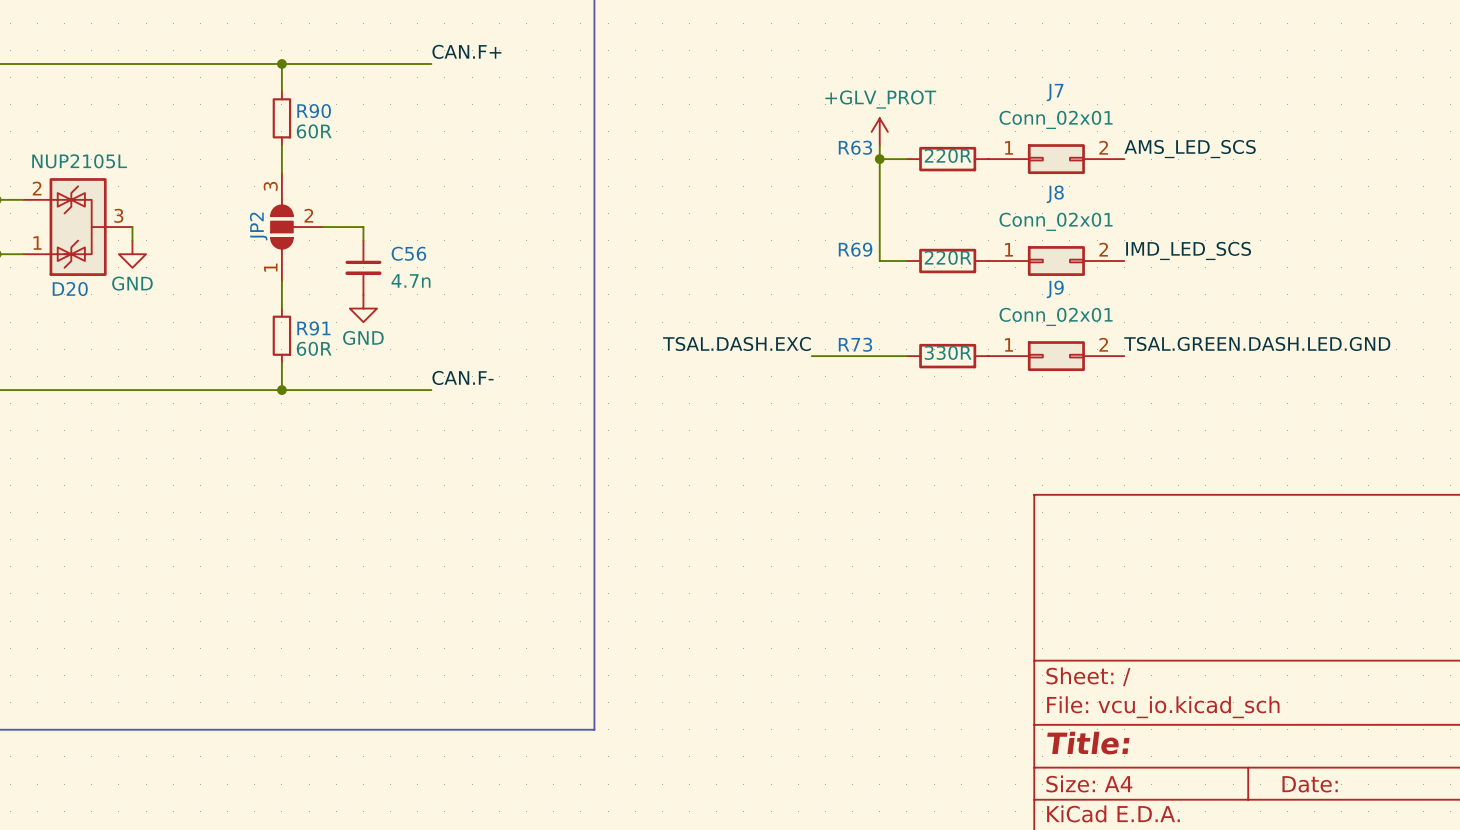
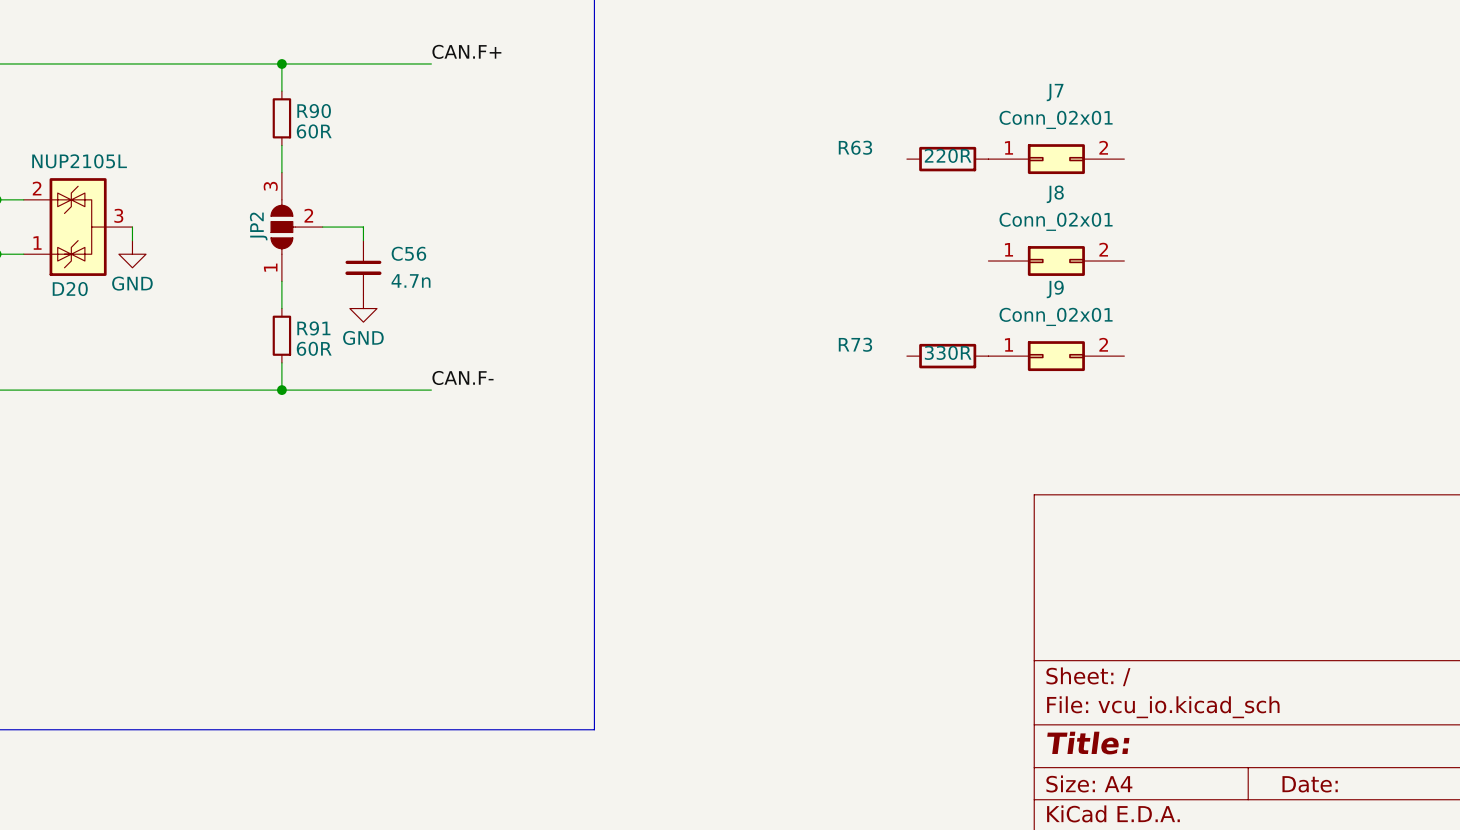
power symbol: +GLV_PROT (879, 131) -> none
wire: (879, 145) (879, 261) (906, 261) -> none
label: AMS_LED_SCS (1190, 149) -> none
wire: (879, 159) (906, 159) -> none
junction: (879, 159) -> none
label: IMD_LED_SCS (1188, 250) -> none
R69: 220R (947, 261) -> none
label: TSAL.DASH.EXC (736, 344) -> none
label: TSAL.GREEN.DASH.LED.GND (1257, 344) -> none
wire: (811, 356) (906, 356) -> none

